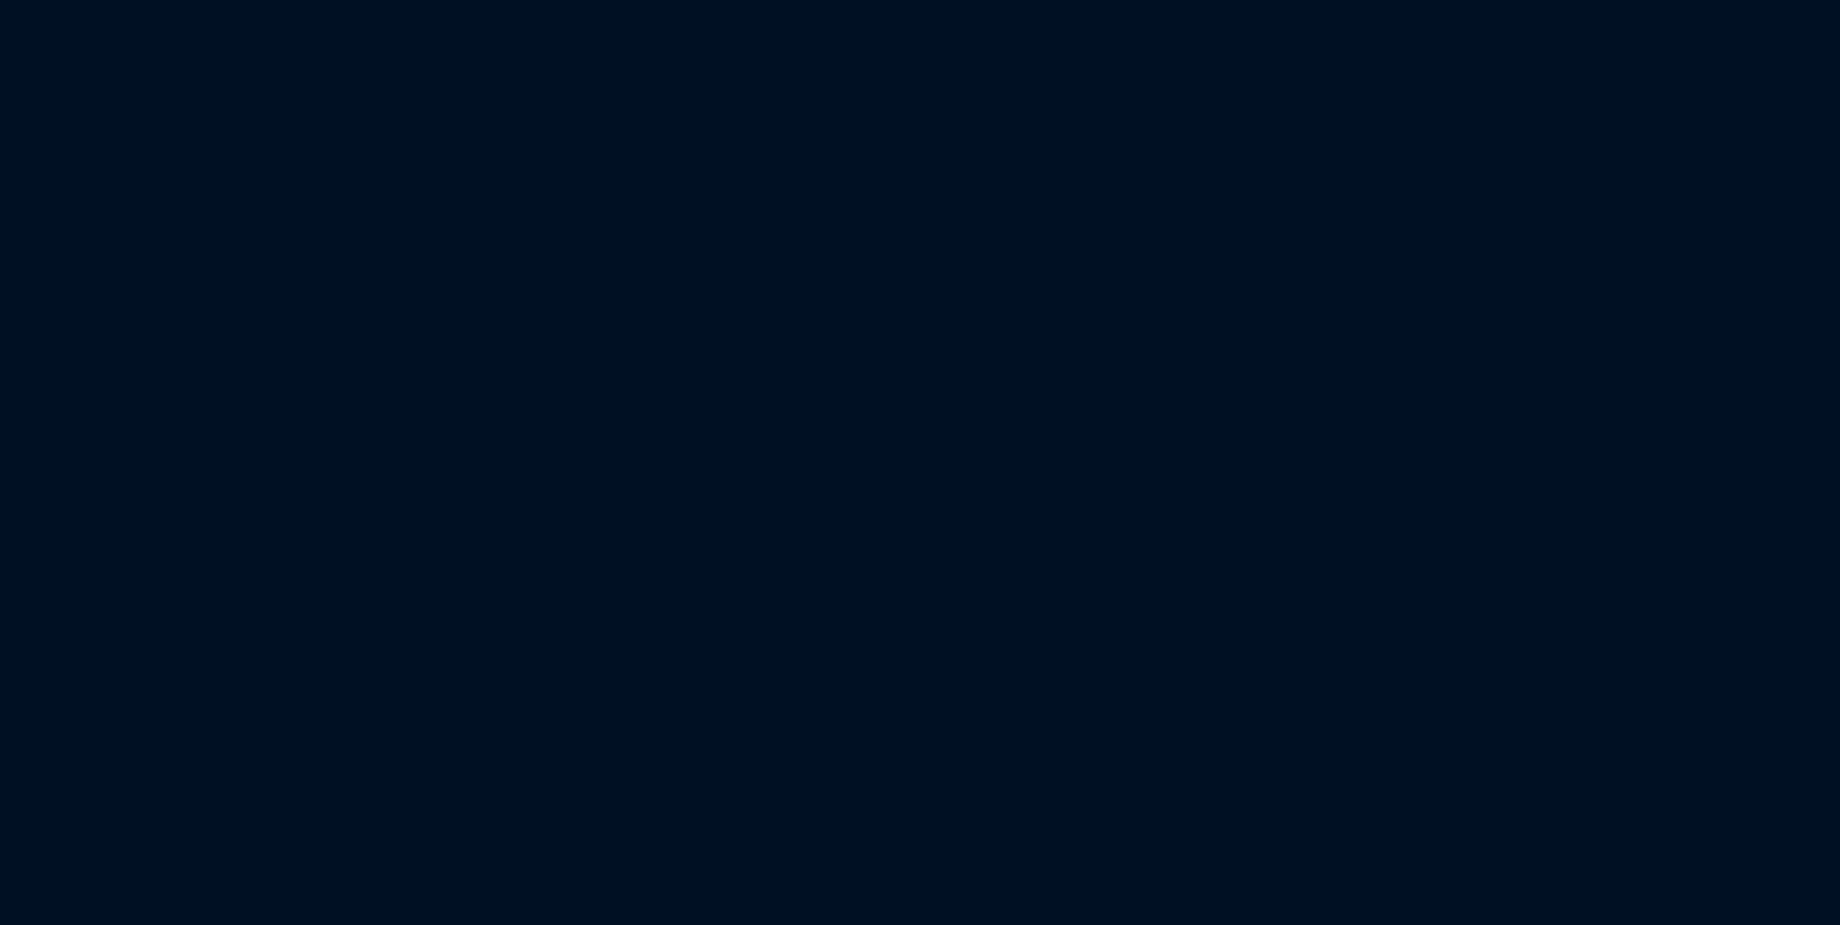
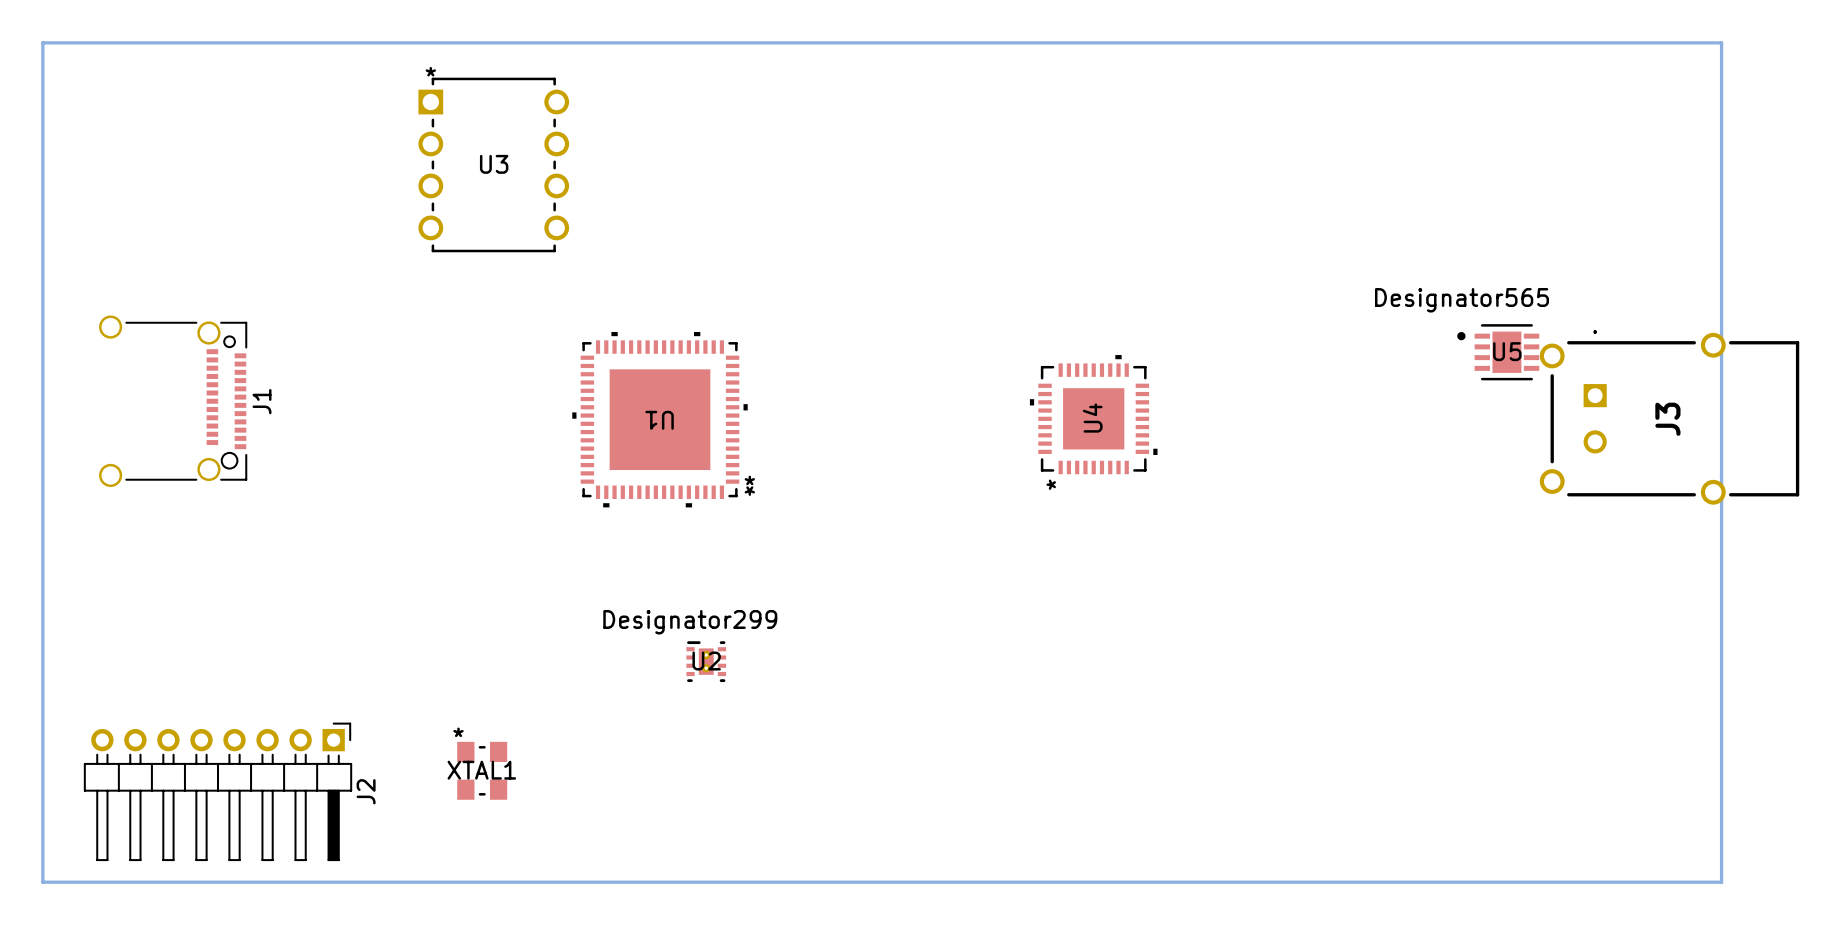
bottom track: none -> (42, 42) (1721, 42) (1721, 882) (42, 882) (42, 42)
U3: none -> (493, 164)
U5: none -> (1498, 352)
J1: none -> (173, 401)
U4: none -> (1093, 414)
J3: none -> (1669, 417)
U1: none -> (659, 419)
U2: none -> (706, 661)
XTAL1: none -> (482, 770)
J2: none -> (218, 791)

